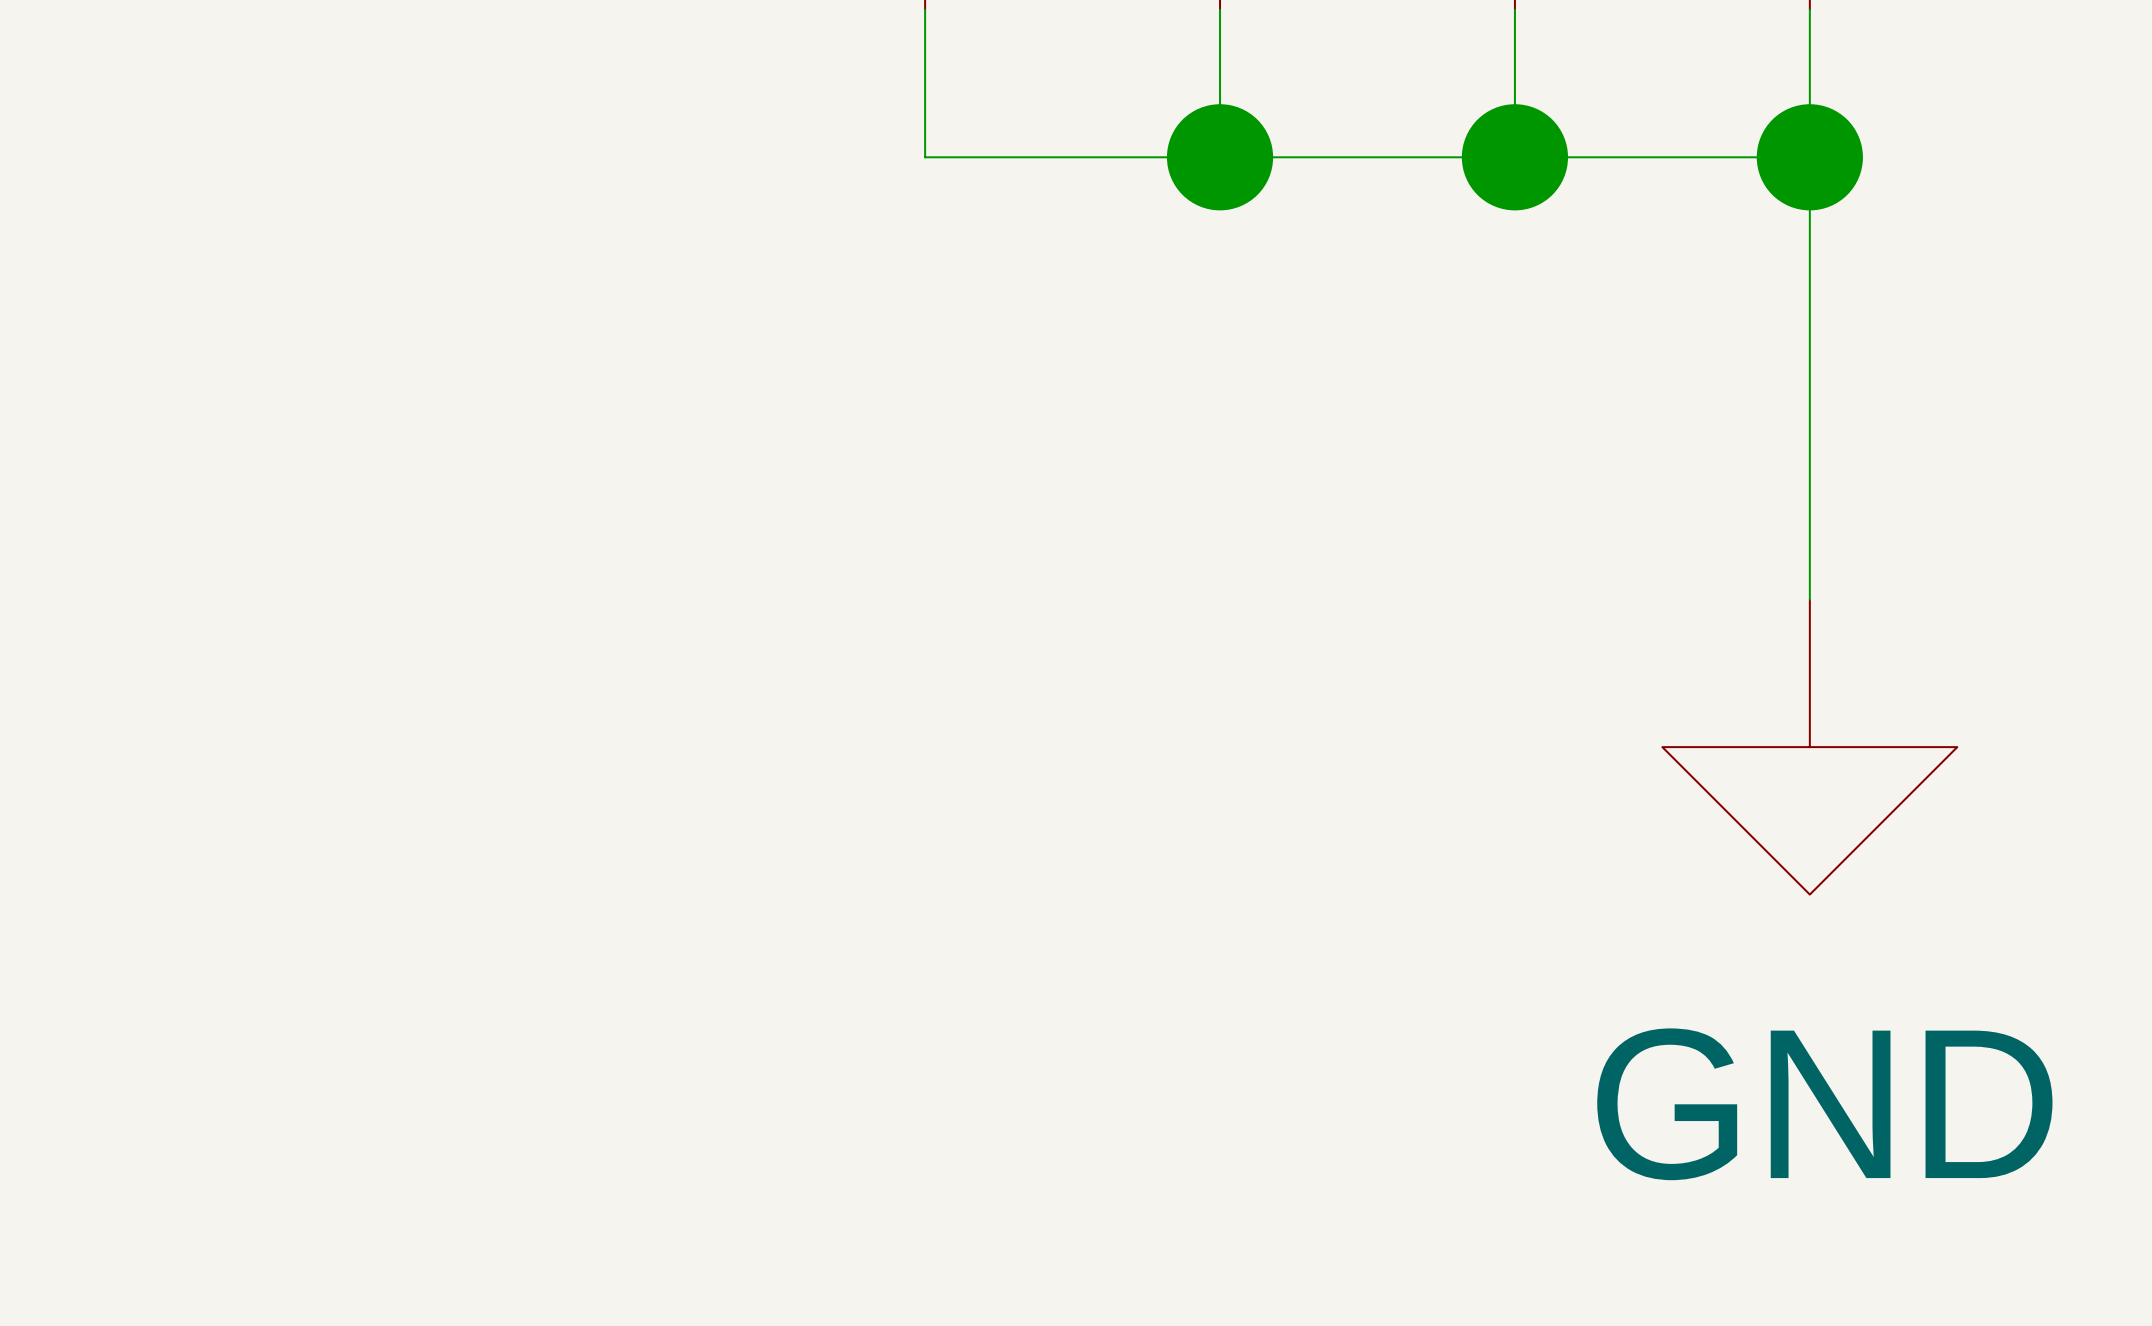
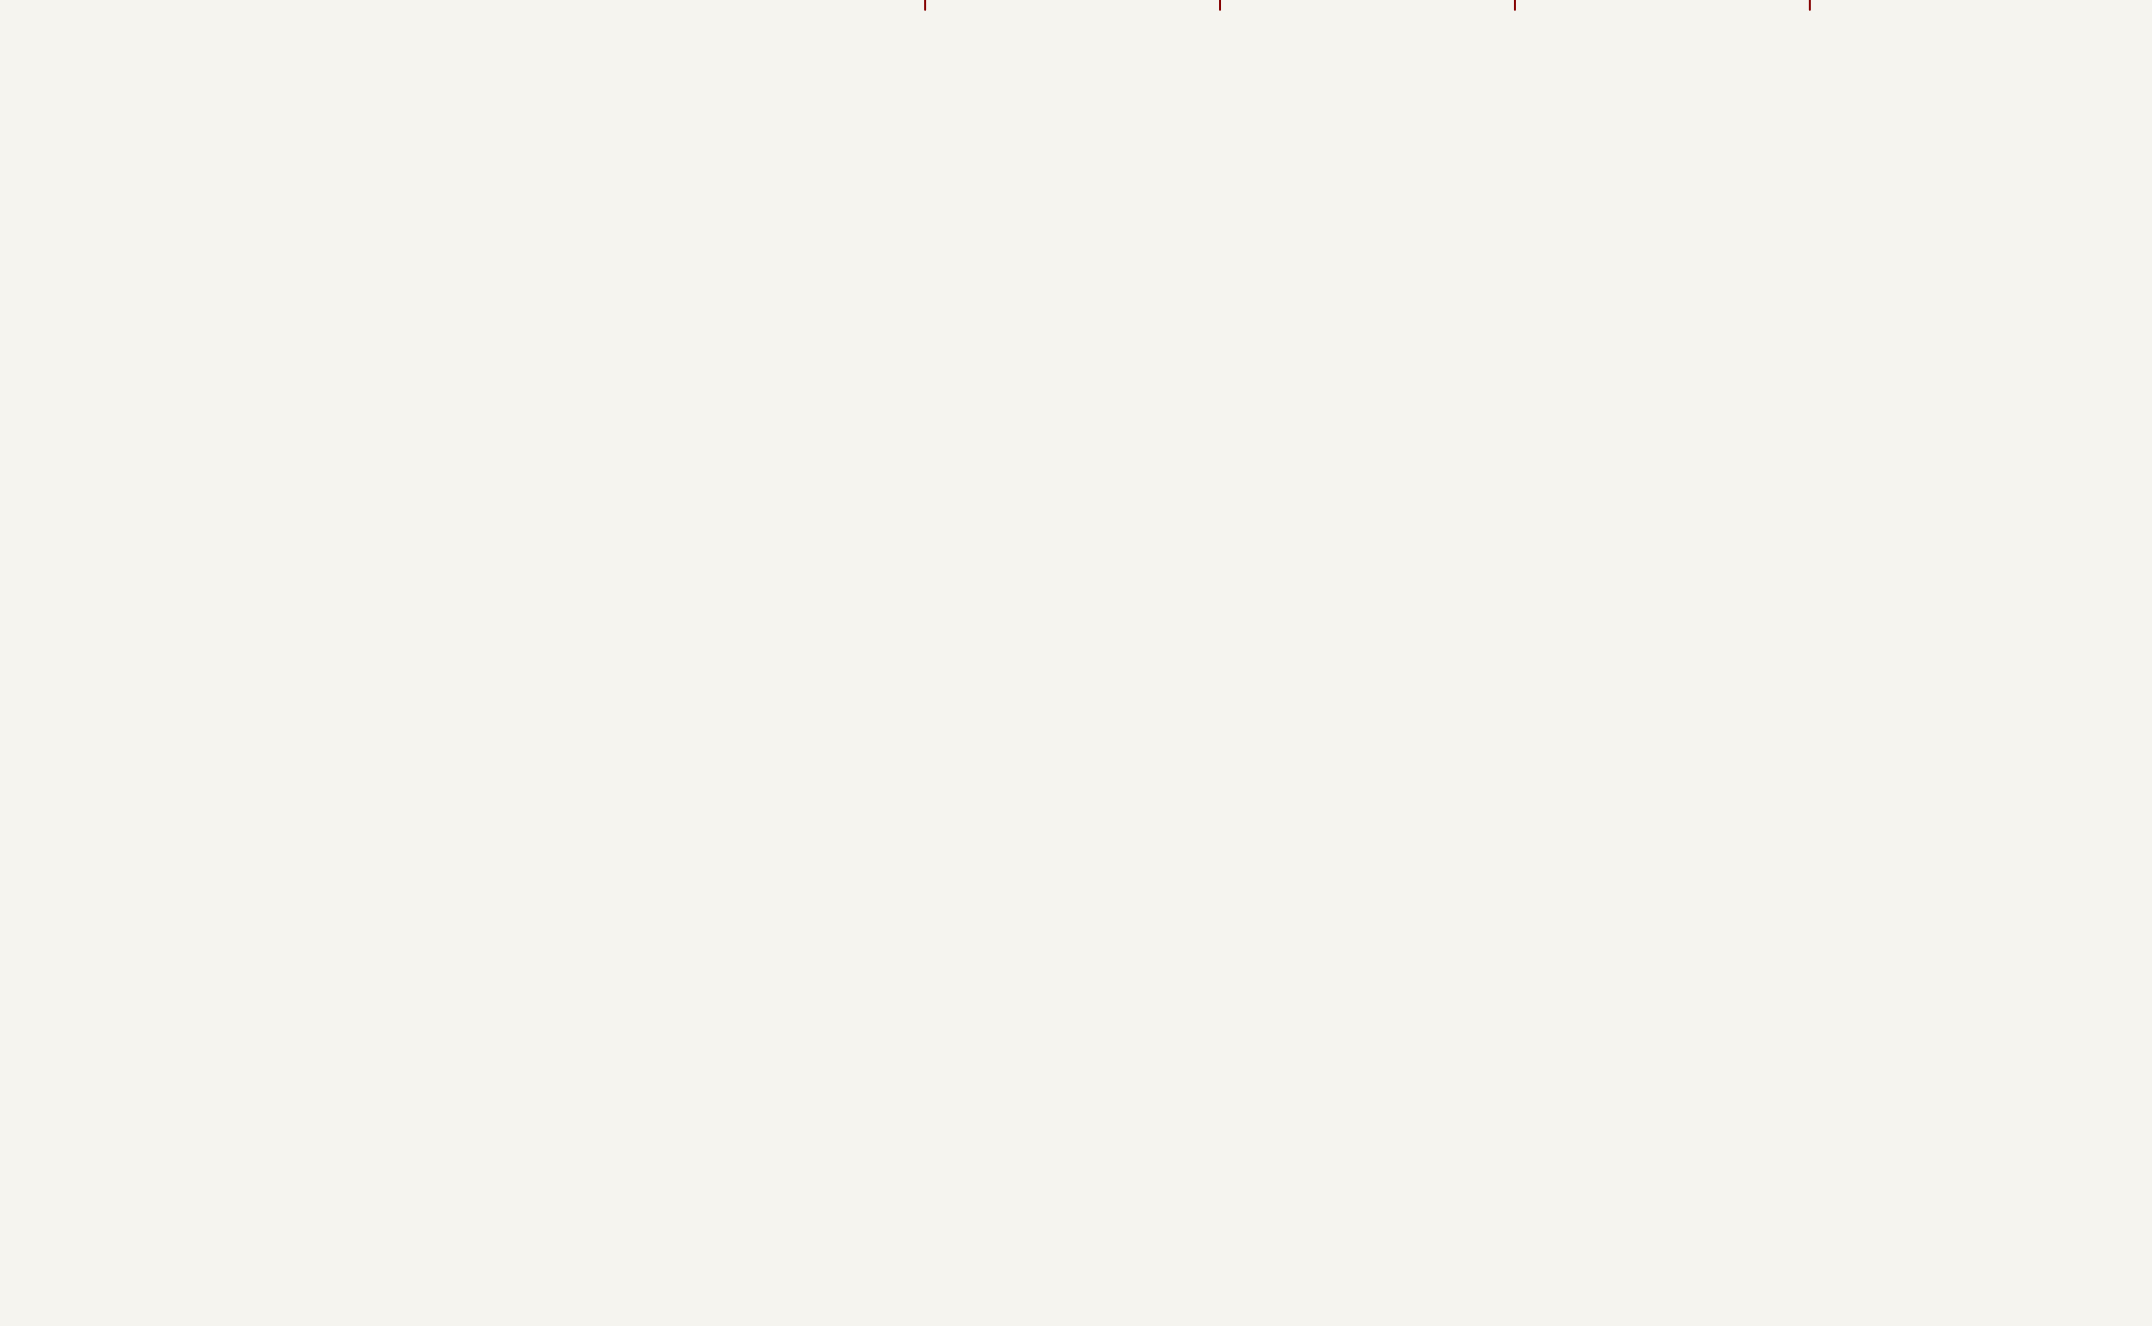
wire: (925, 9) (925, 157) (1809, 157) -> none
wire: (1220, 9) (1220, 157) -> none
wire: (1514, 9) (1514, 157) -> none
wire: (1809, 9) (1809, 599) -> none
junction: (1220, 157) -> none
junction: (1514, 157) -> none
junction: (1809, 157) -> none
power symbol: GND (1809, 747) -> none

